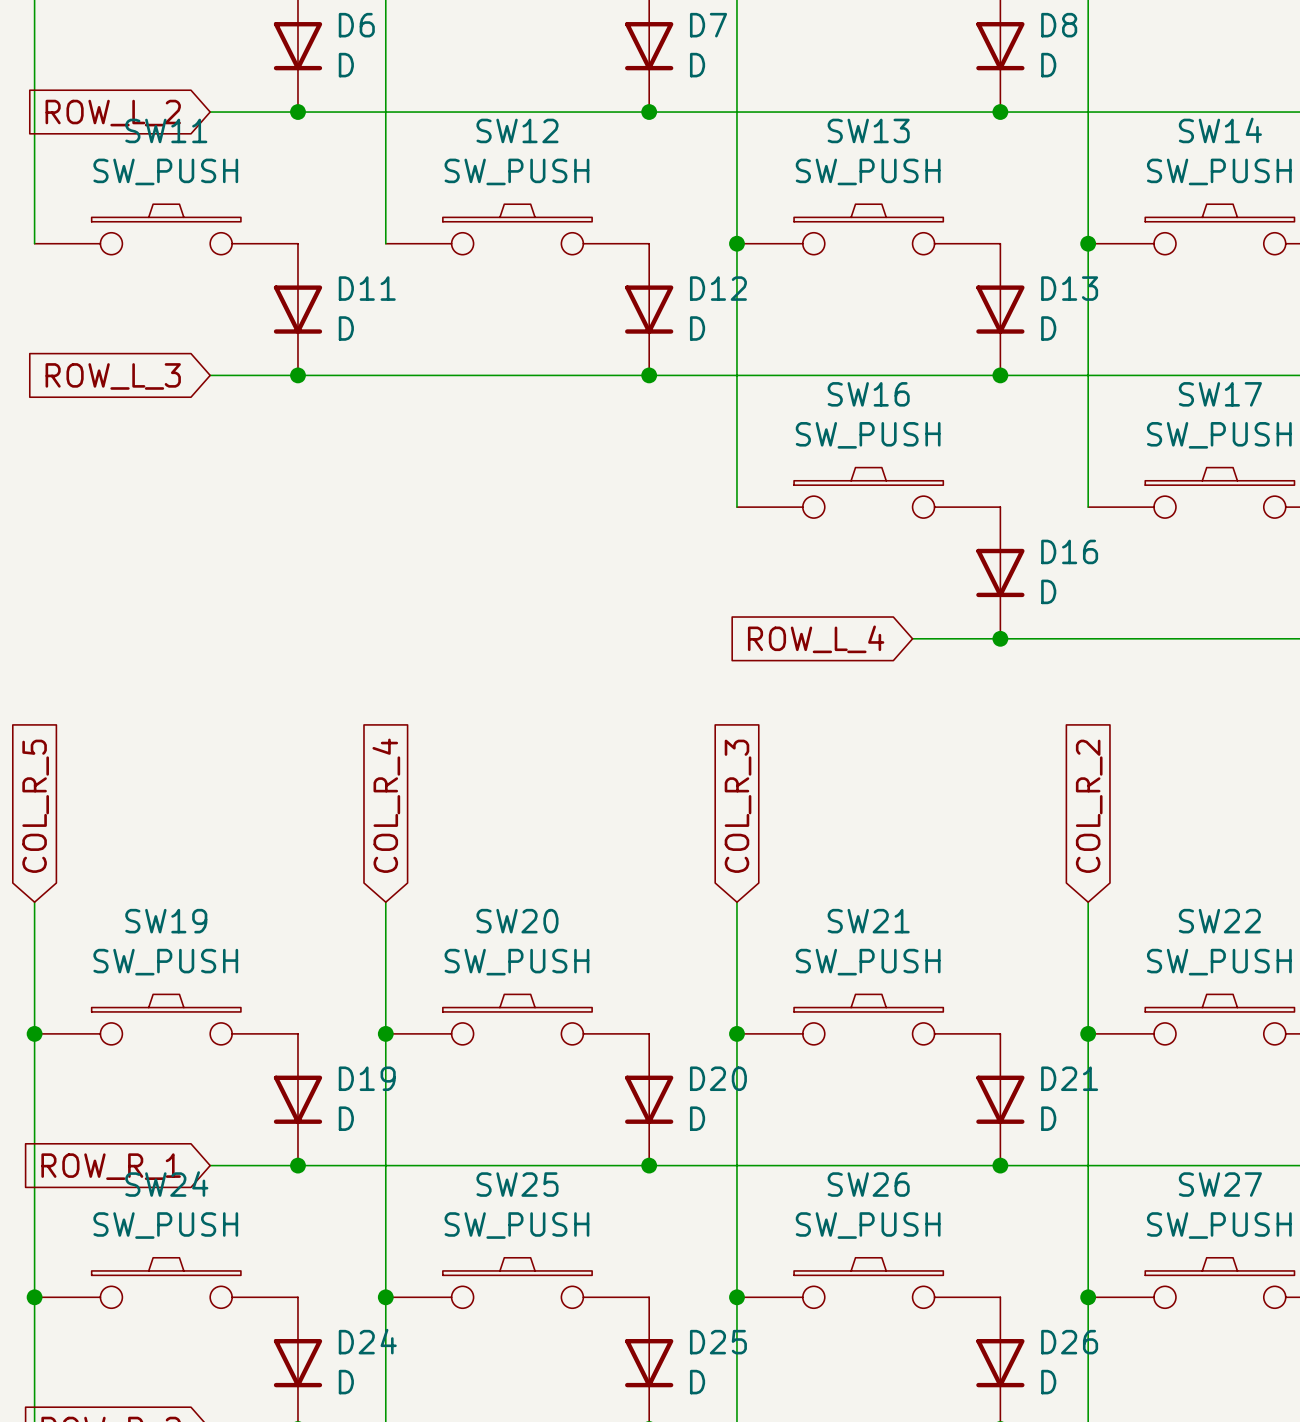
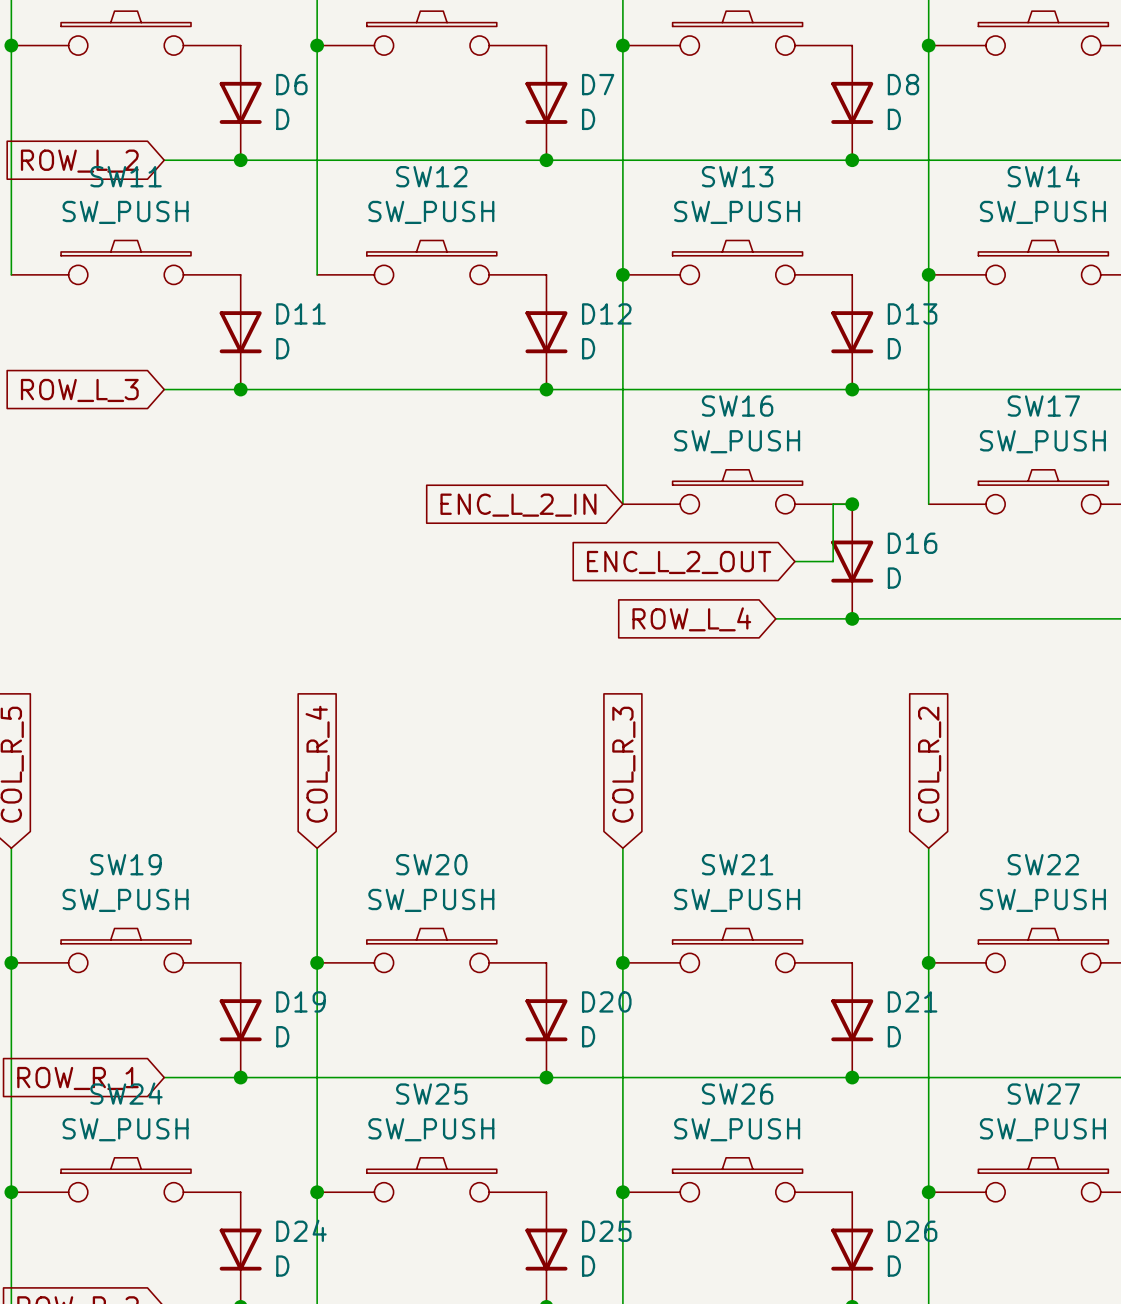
wire: none -> (852, 504) (833, 504) (833, 561) (794, 561)
junction: none -> (852, 504)
global label: none -> ENC_L_2_IN (518, 505)
global label: none -> ENC_L_2_OUT (679, 562)

